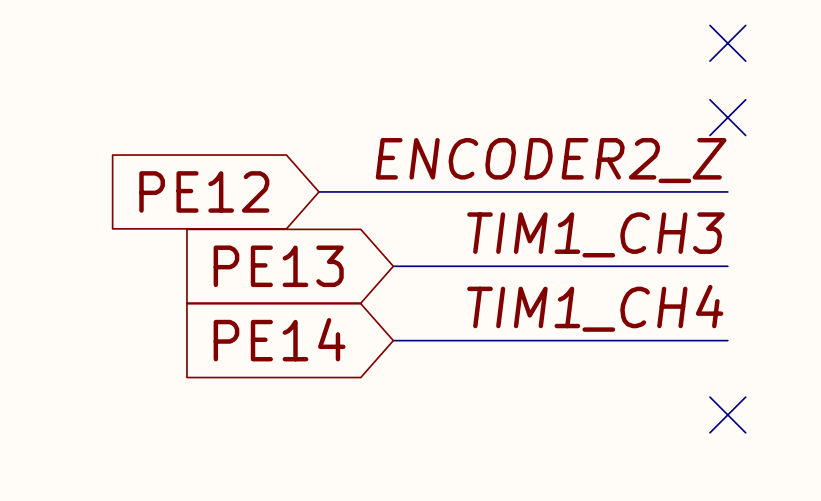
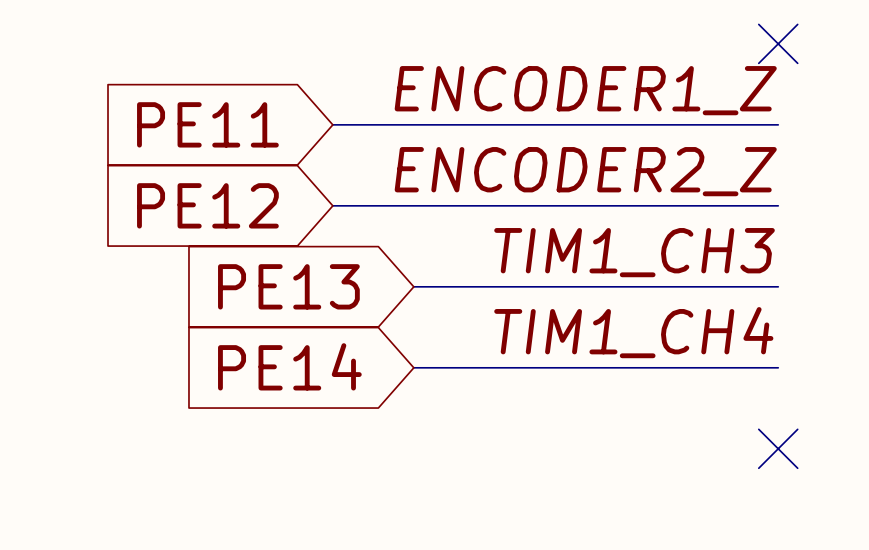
label: none -> ENCODER1_Z (585, 90)
global label: none -> PE11 (207, 124)
wire: none -> (332, 124) (778, 124)
no-connect mark: (727, 117) -> none

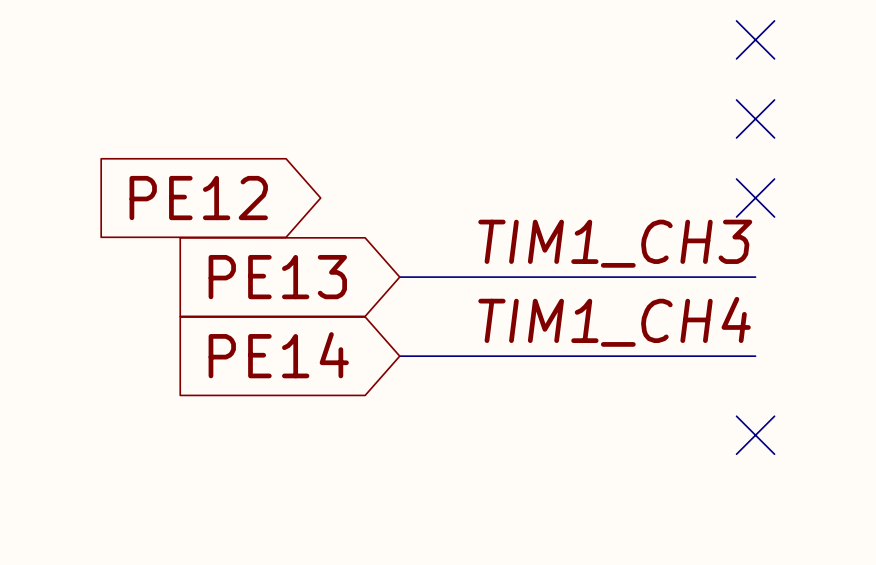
label: ENCODER1_Z (585, 90) -> none
global label: PE11 (207, 124) -> none
wire: (332, 124) (778, 124) -> none
no-connect mark: none -> (755, 118)
label: ENCODER2_Z (585, 171) -> none
wire: (332, 205) (778, 205) -> none
no-connect mark: none -> (755, 198)

